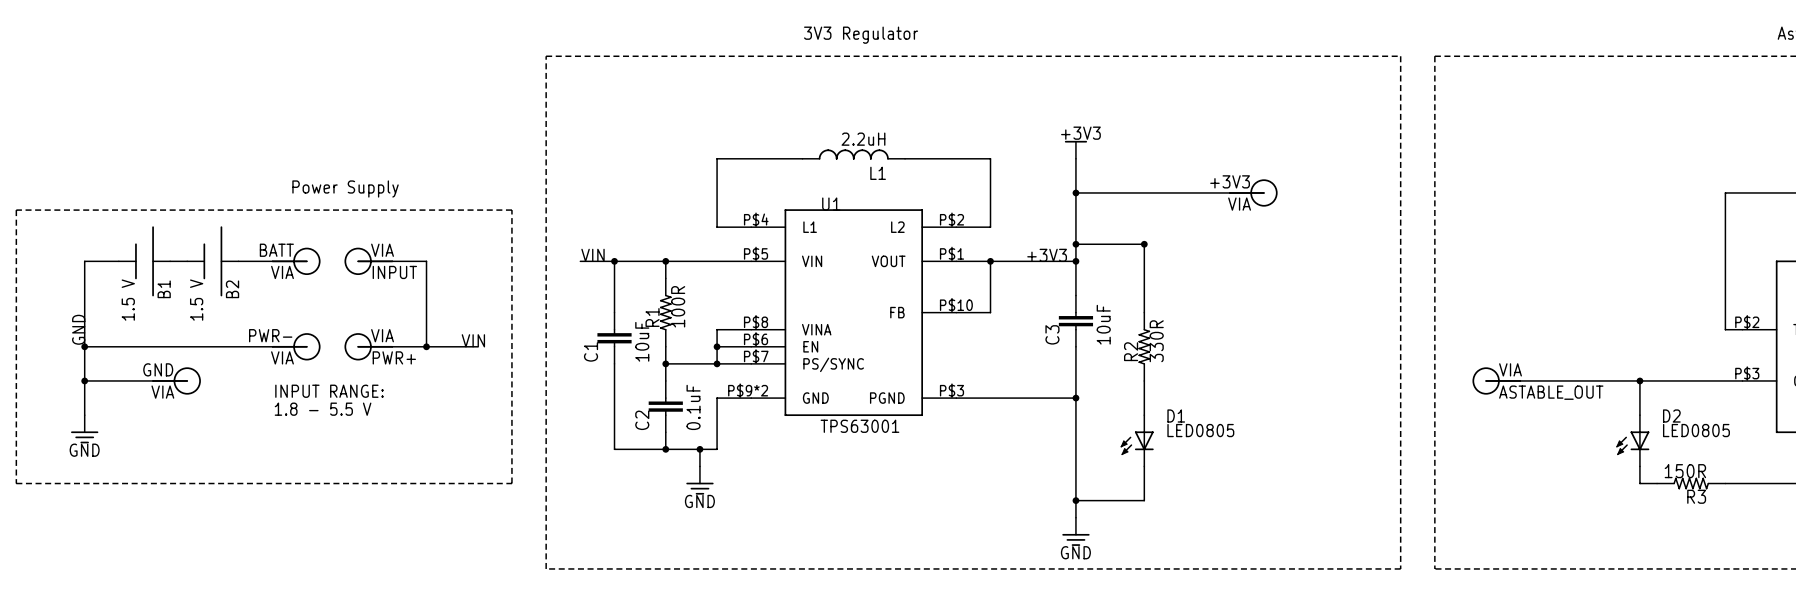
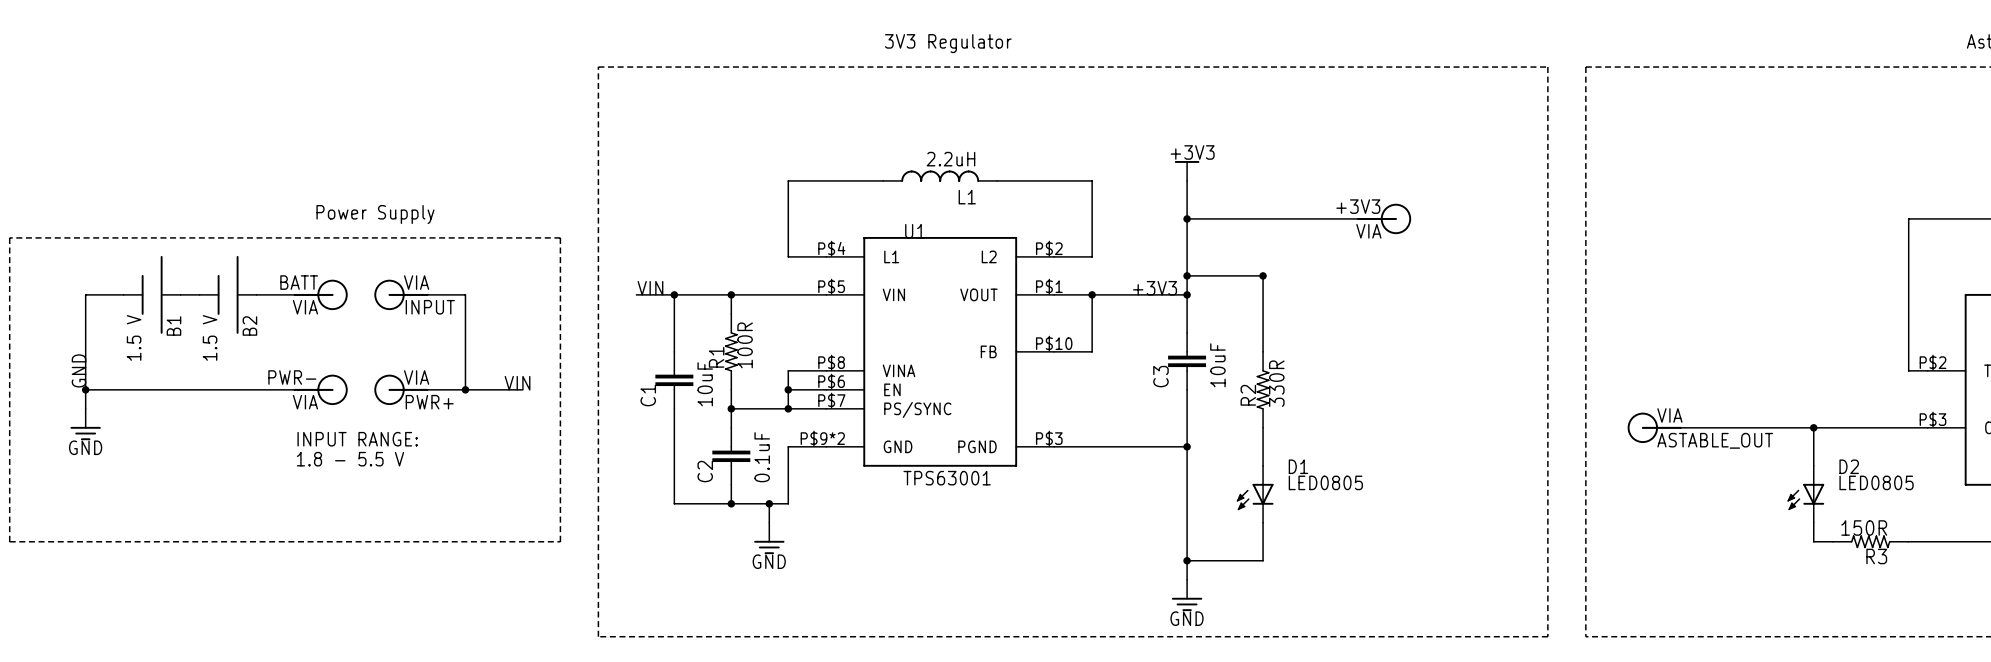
wire: (84, 363) (84, 415) -> none
wire: (84, 380) (153, 380) -> none
junction: (84, 380) -> none
part: GND (176, 380) -> none
power symbol position: GND (84, 429) -> GND (85, 424)

